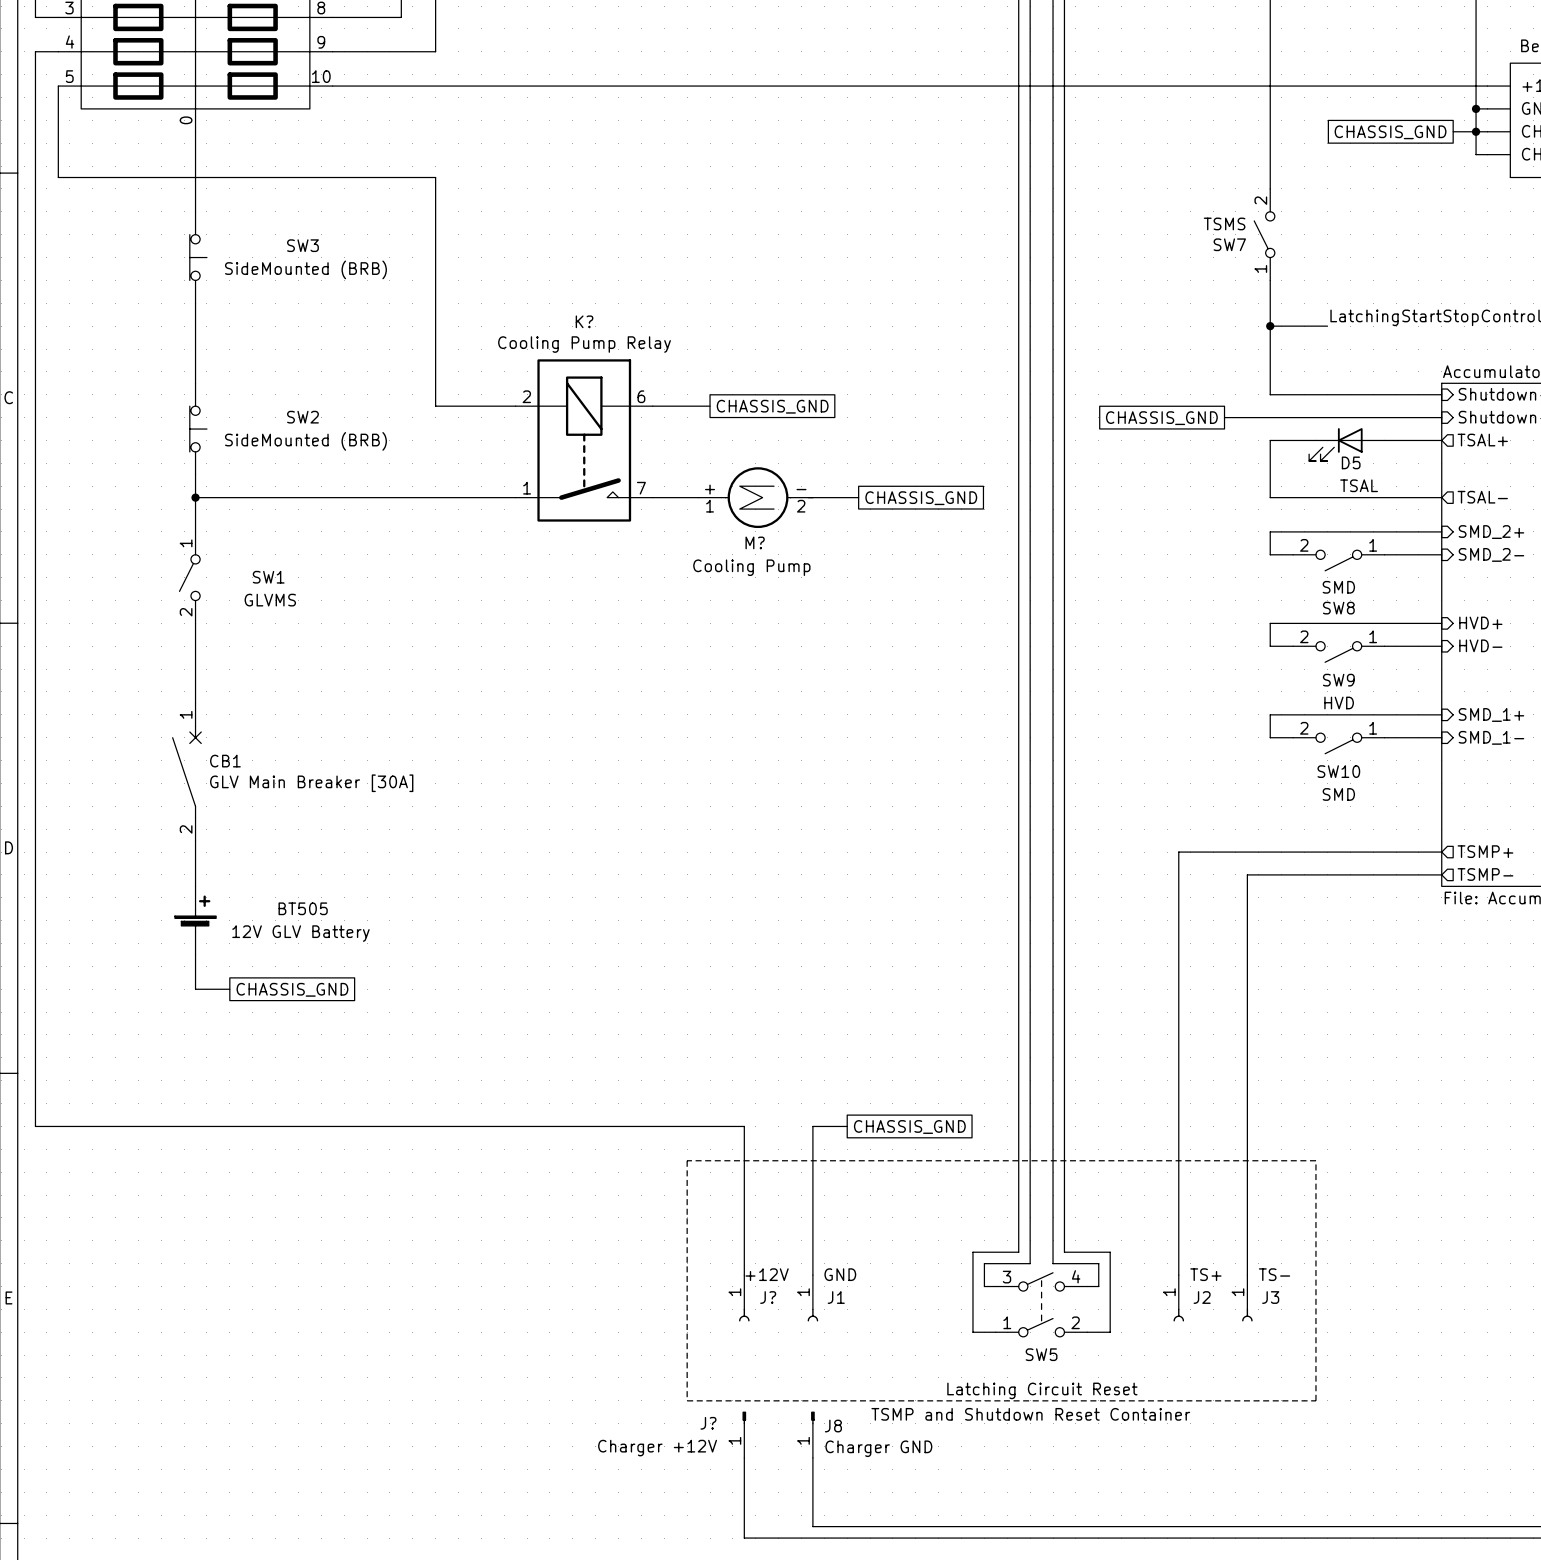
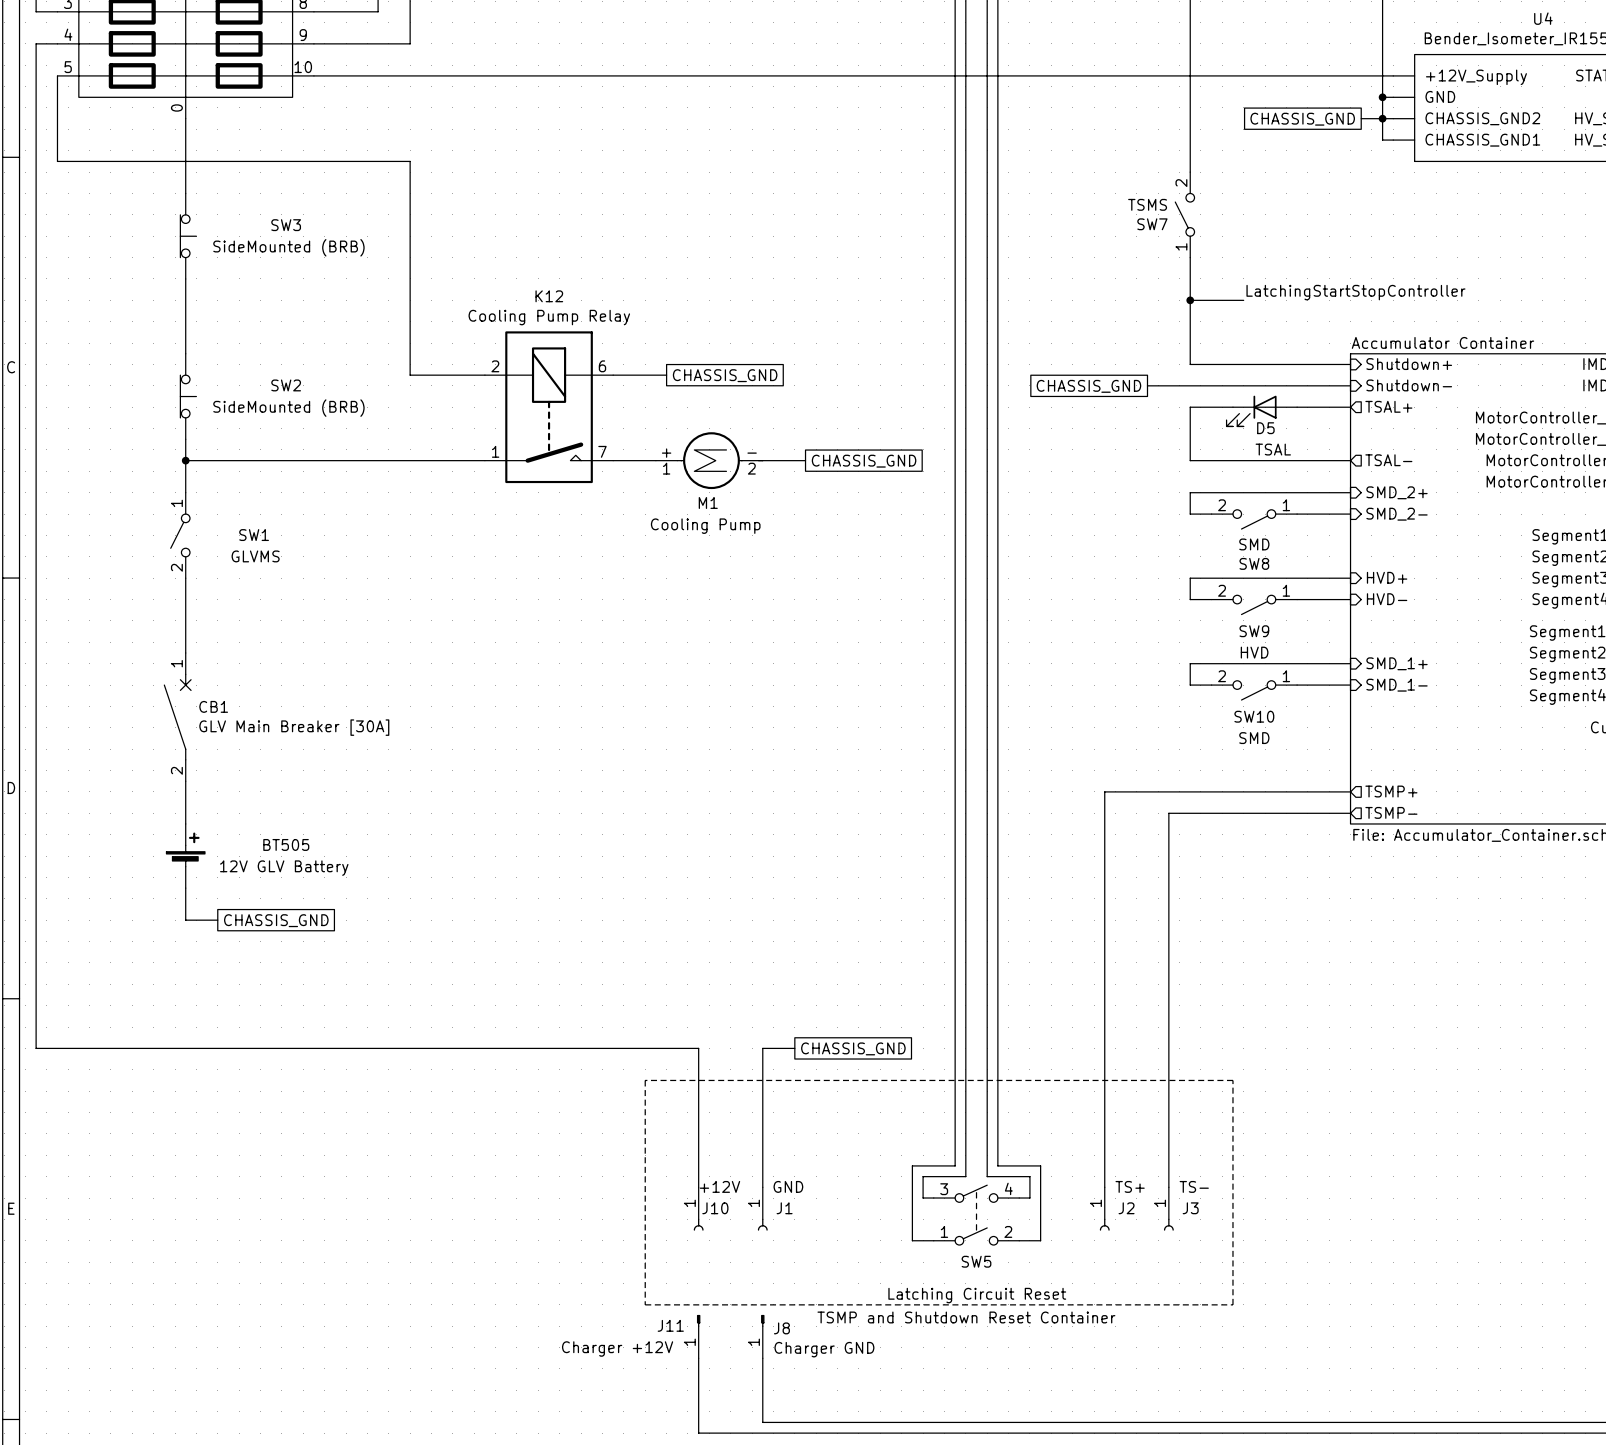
K? name: K? (584, 321) -> K12 (549, 296)
M? name: M? (755, 542) -> M1 (708, 502)
J? name: J? (768, 1297) -> J10 (715, 1208)
J? name: J? (708, 1423) -> J11 (670, 1325)

